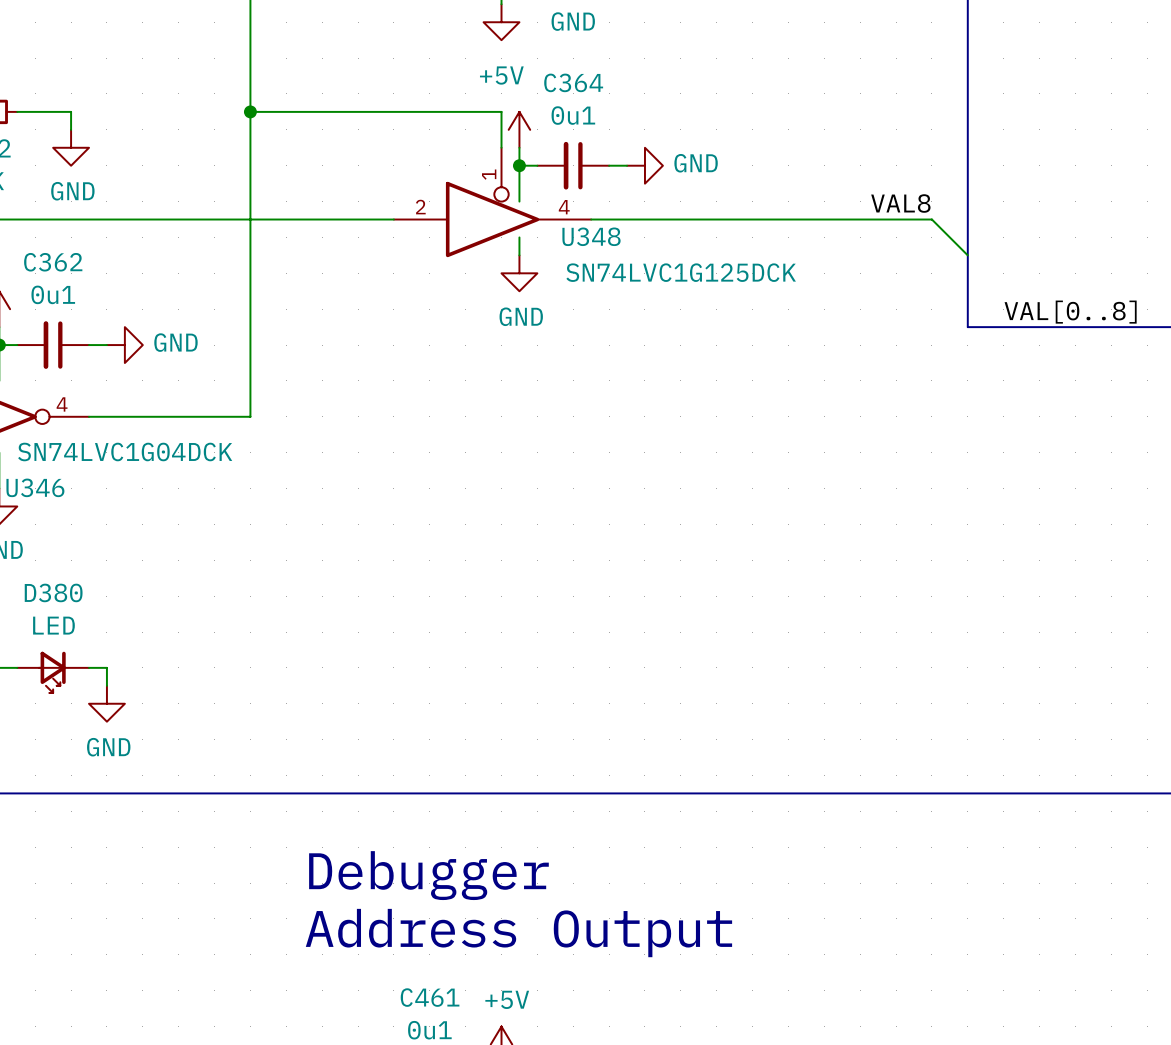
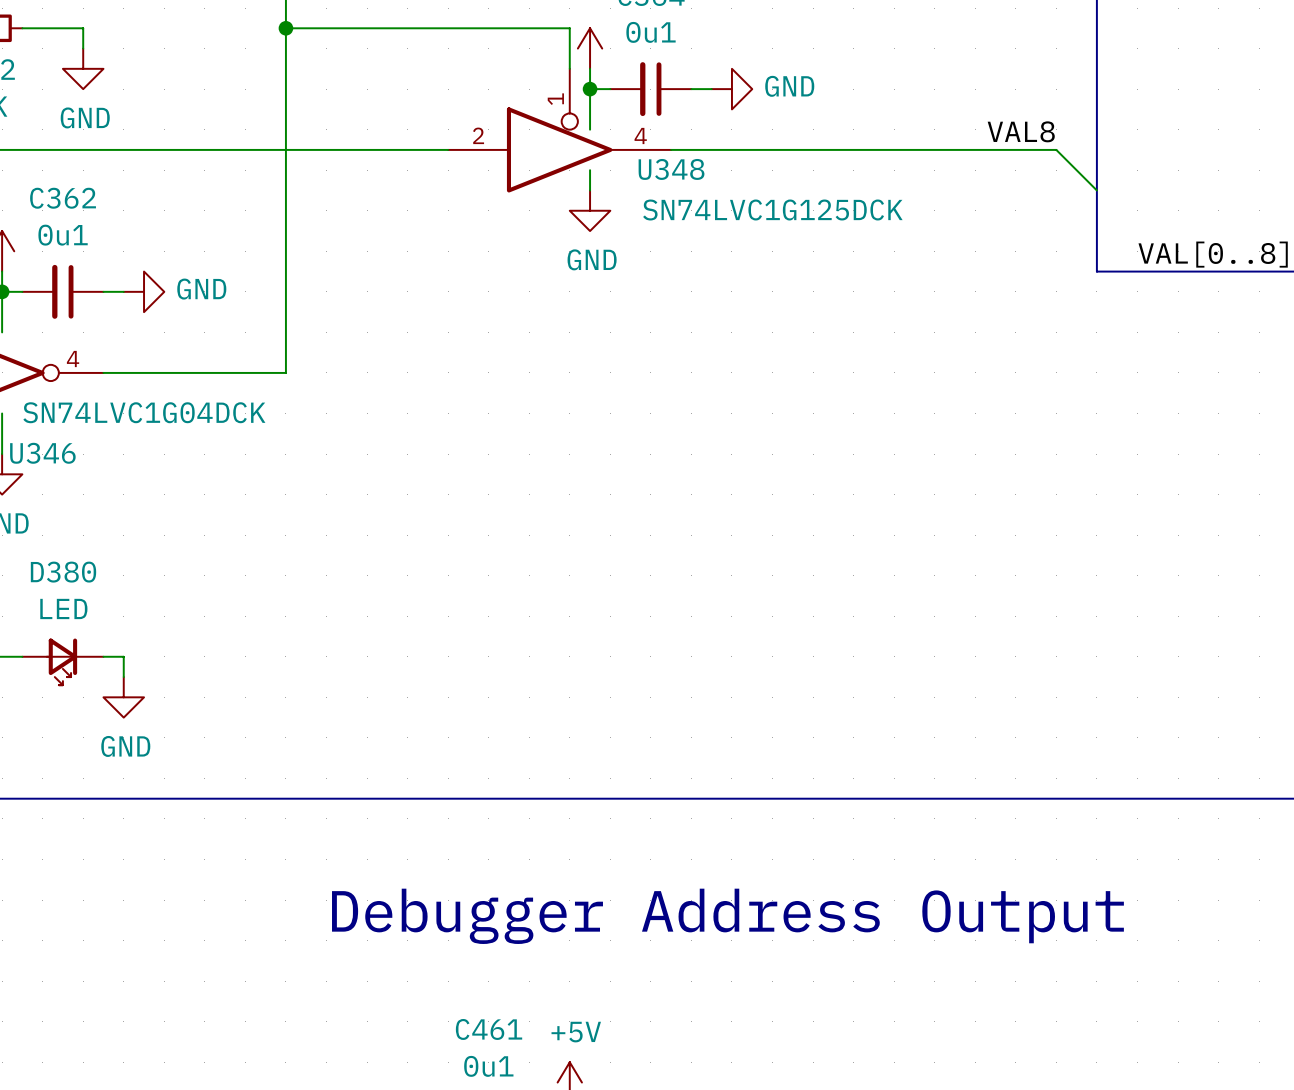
text: Debugger (428, 875) -> none
text: Address Output (518, 933) -> Debugger Address Output (727, 916)

